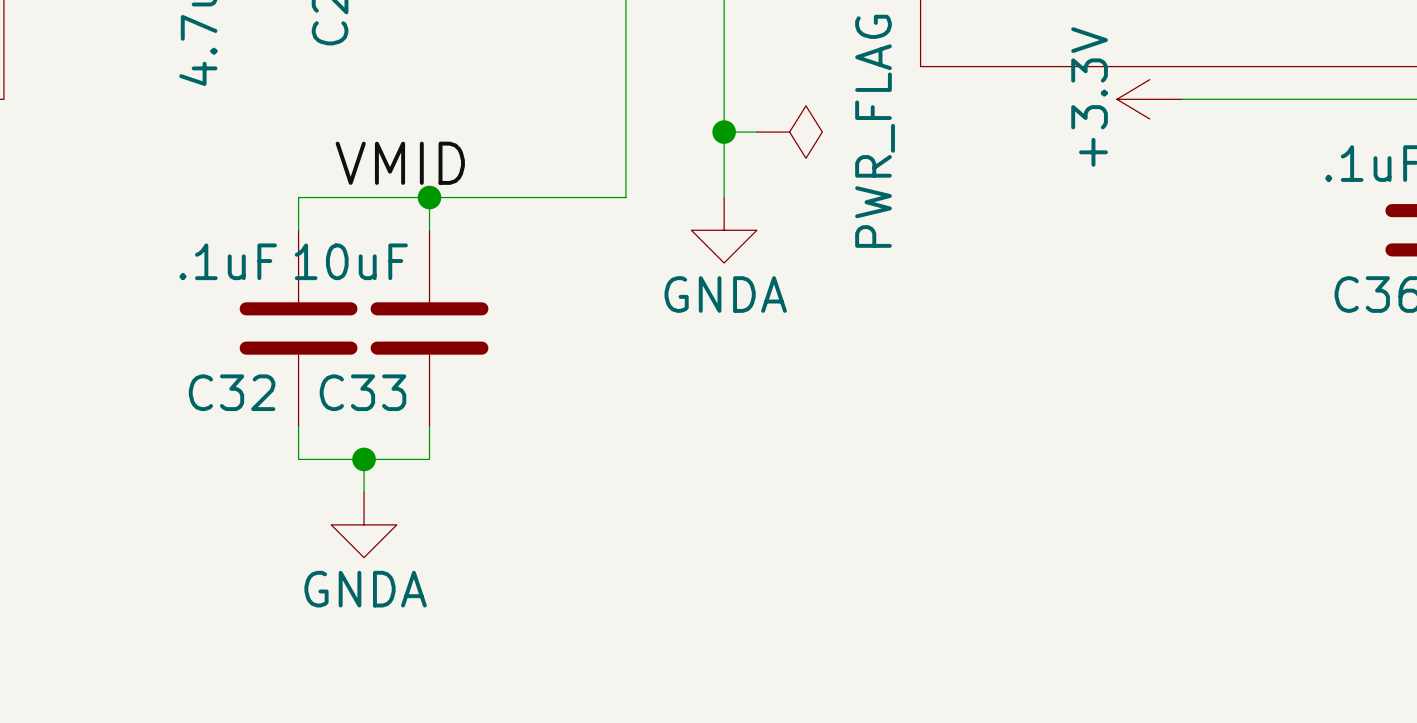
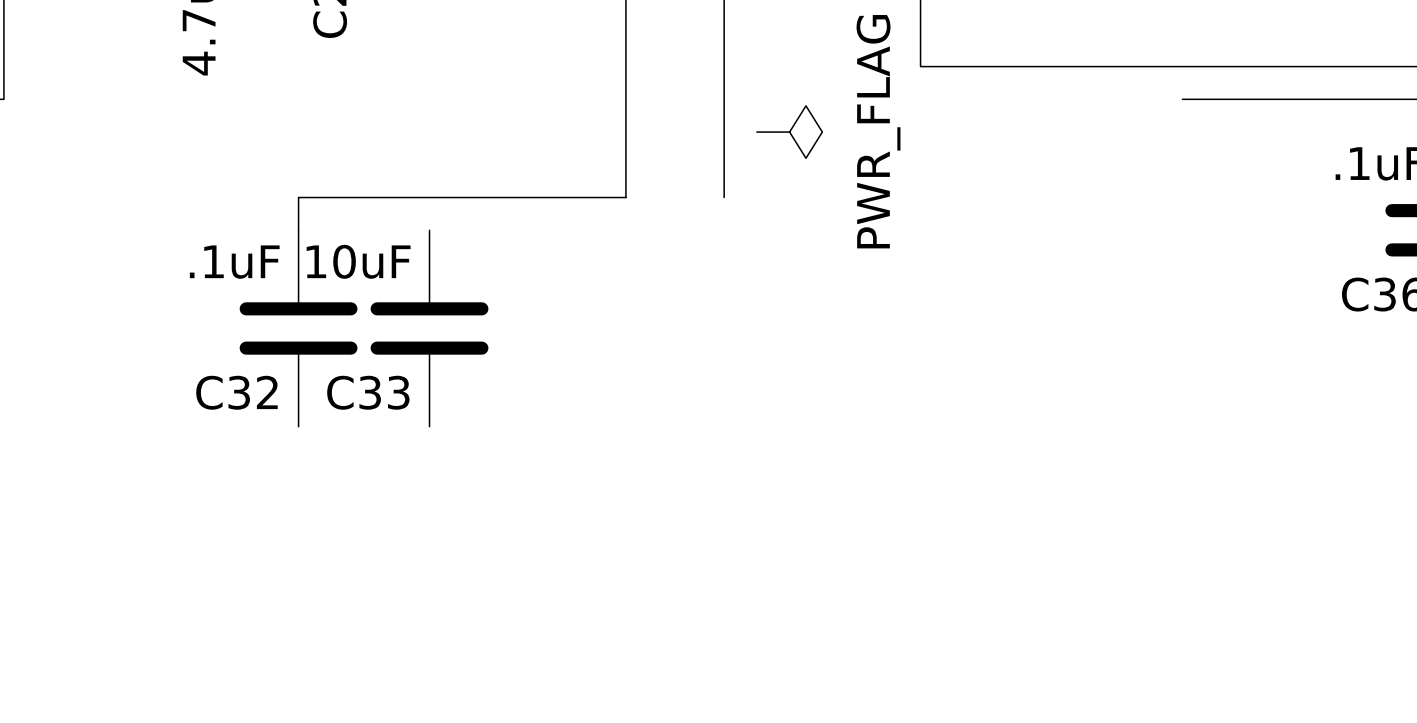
power symbol: +3.3V (1149, 99) -> none
wire: (724, 132) (756, 132) -> none
junction: (724, 132) -> none
label: VMID (400, 163) -> none
wire: (429, 197) (429, 230) -> none
junction: (429, 197) -> none
power symbol: GNDA (724, 230) -> none
wire: (298, 426) (298, 459) (429, 459) (429, 426) -> none
wire: (364, 459) (364, 492) -> none
junction: (364, 459) -> none
power symbol: GNDA (364, 524) -> none

